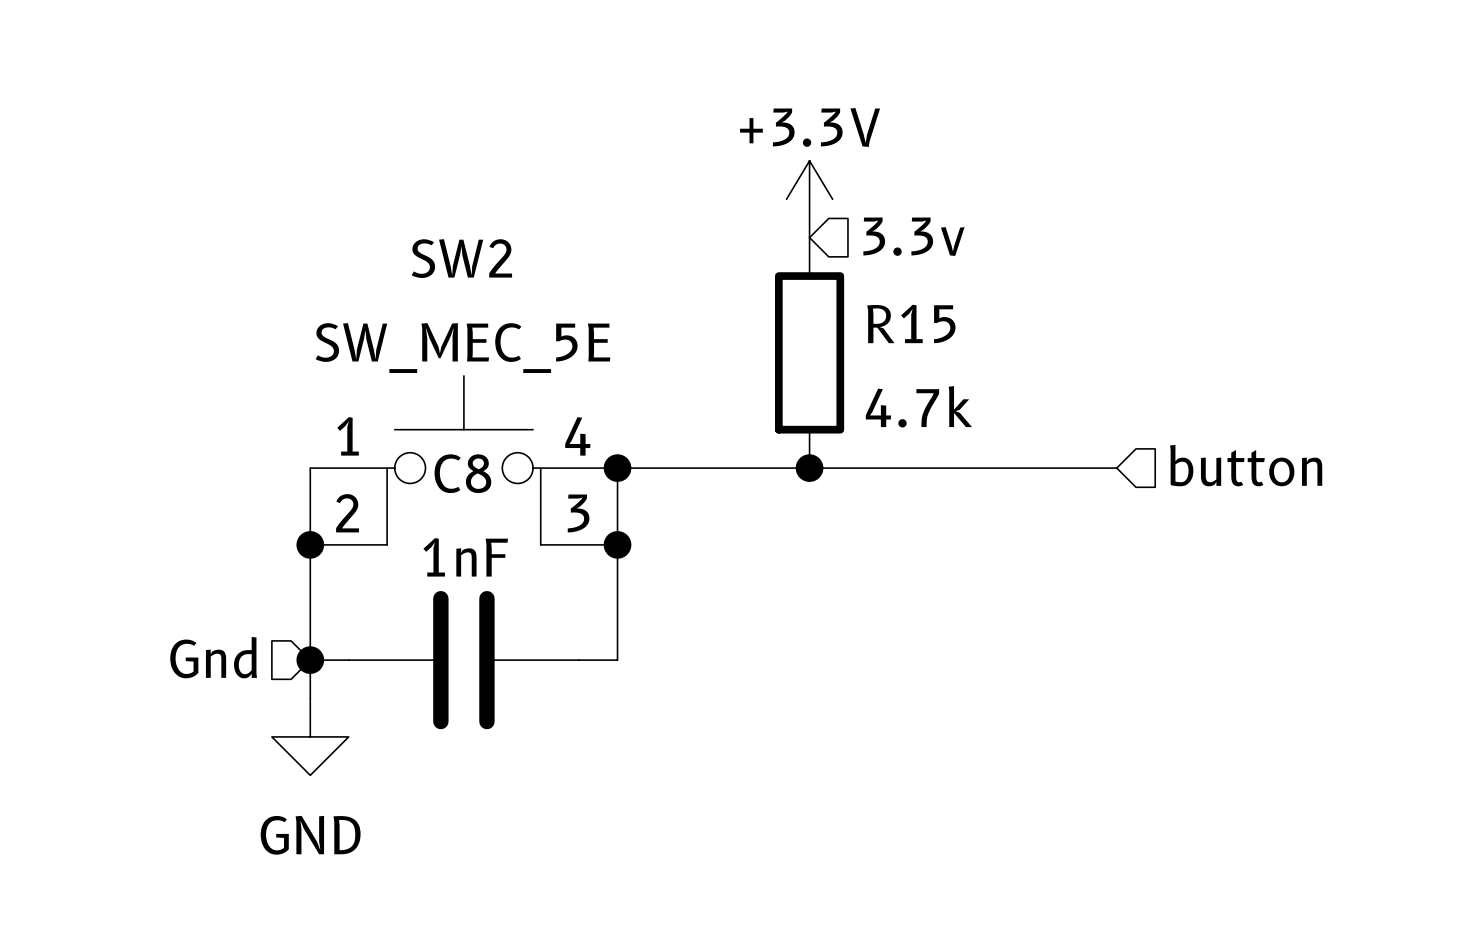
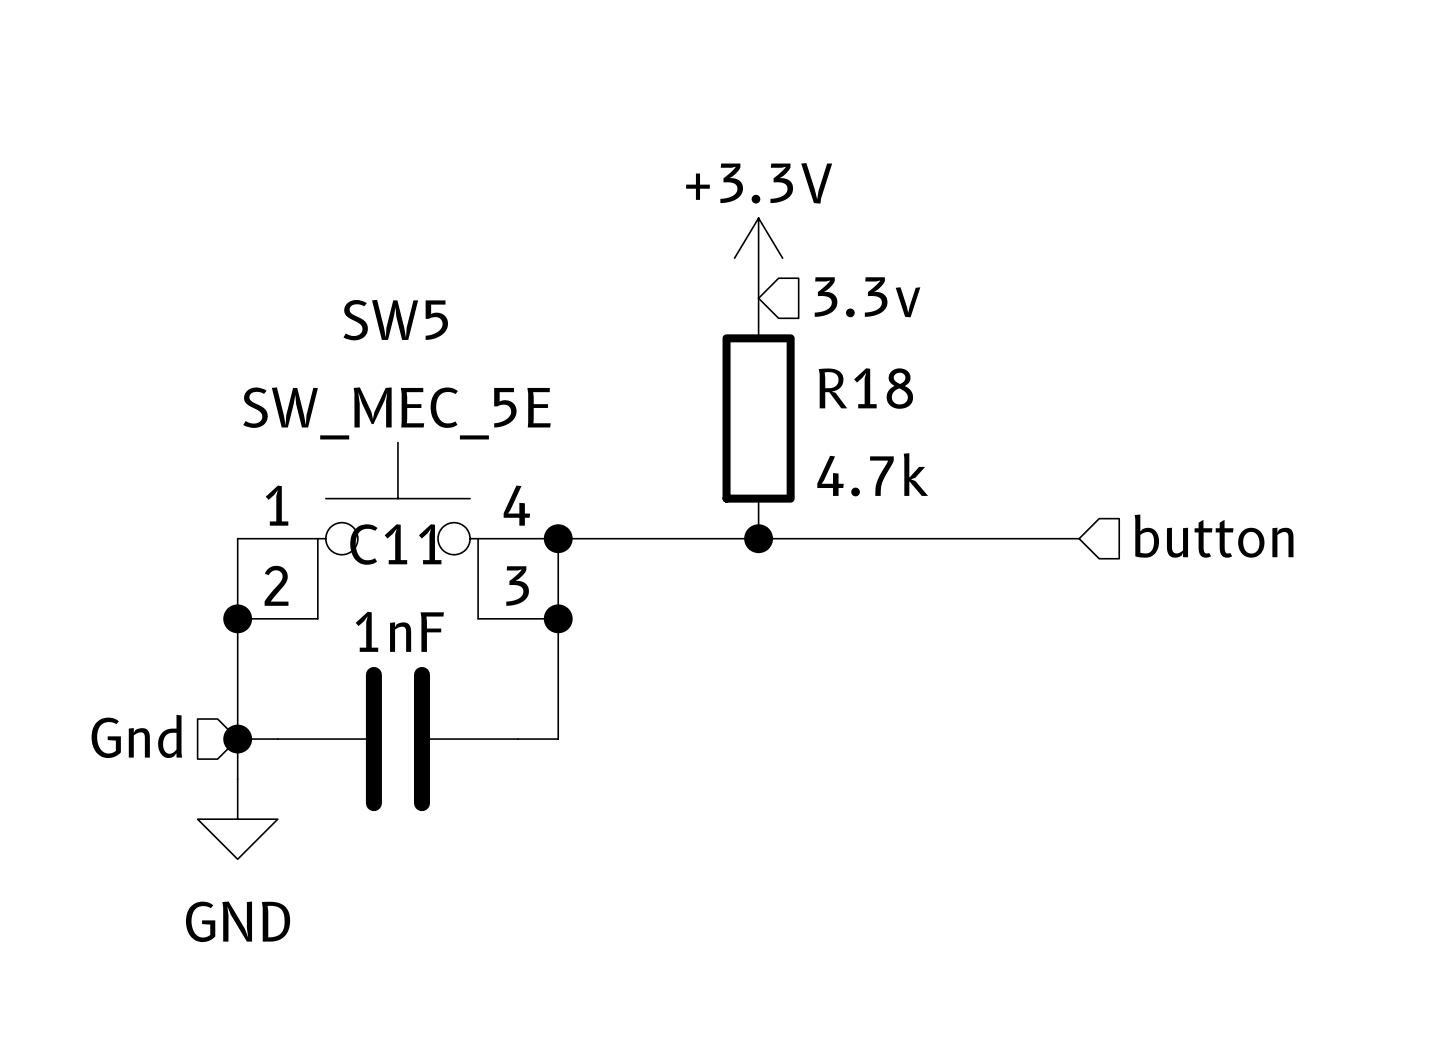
SW2 name: SW2 (461, 258) -> SW5 (395, 320)
R15 name: R15 (911, 323) -> R18 (865, 388)
C8 name: C8 (462, 473) -> C11 (395, 544)

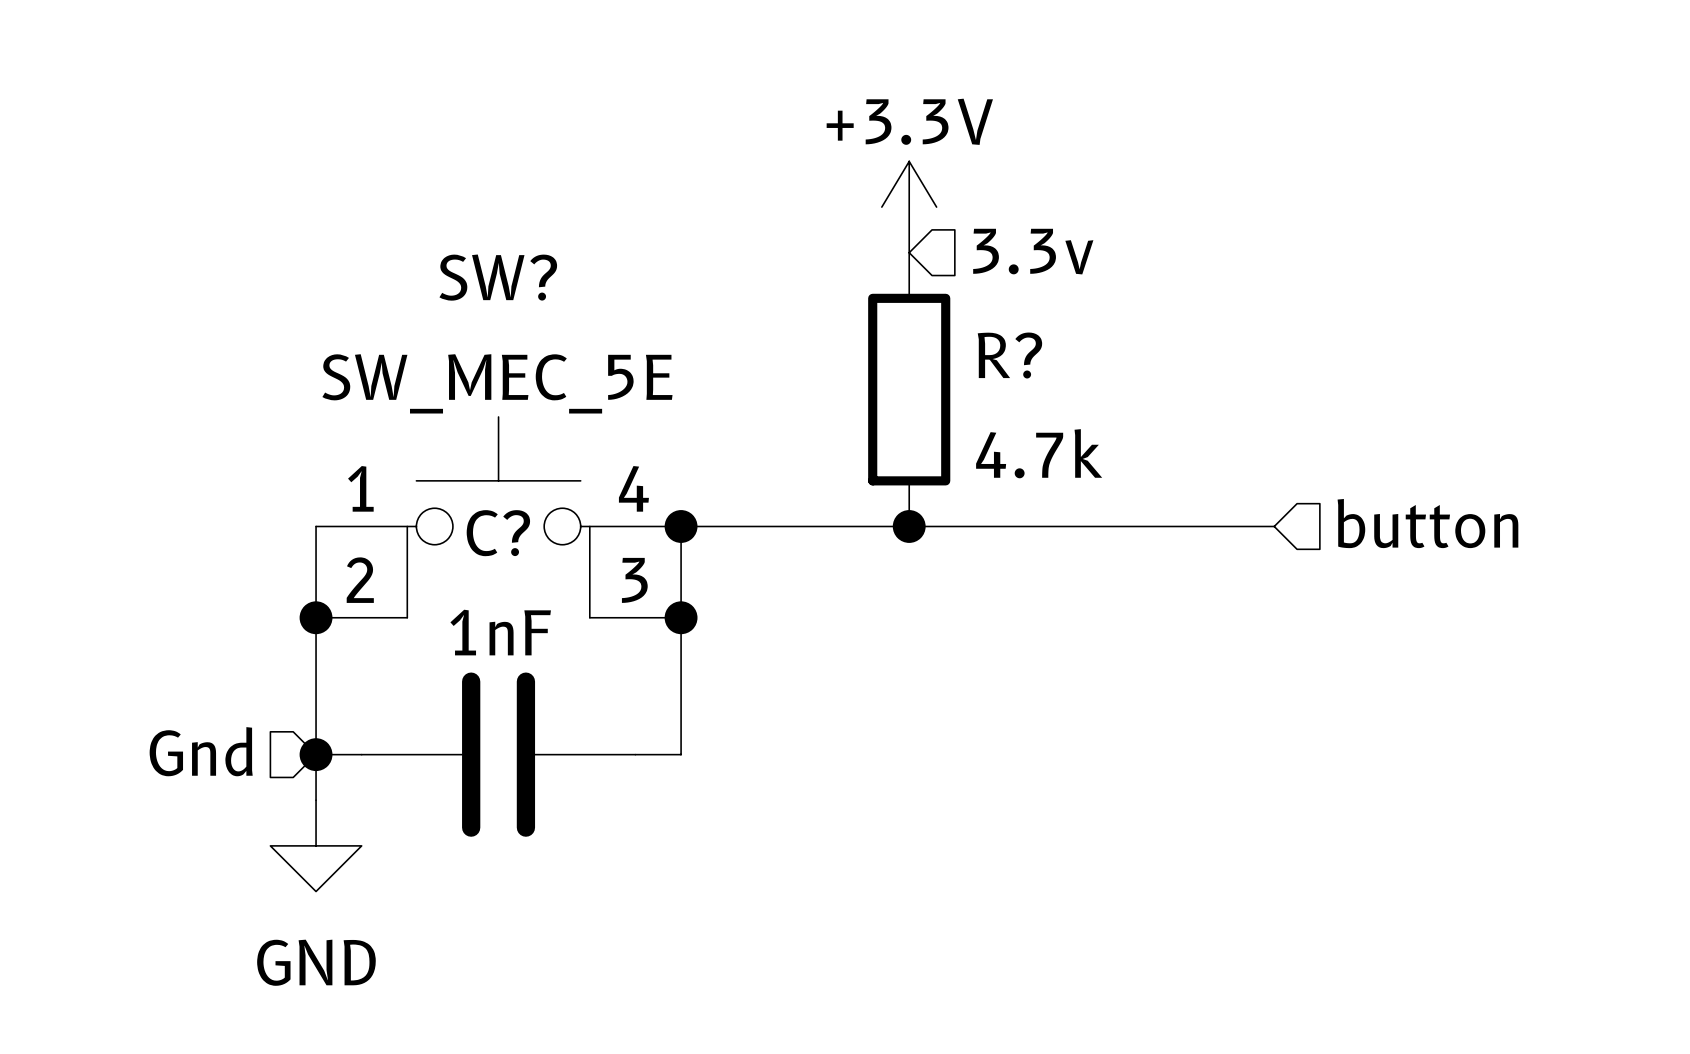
SW5 name: SW5 (395, 320) -> SW? (498, 277)
R18 name: R18 (865, 388) -> R? (1009, 355)
C11 name: C11 (395, 544) -> C? (498, 533)

